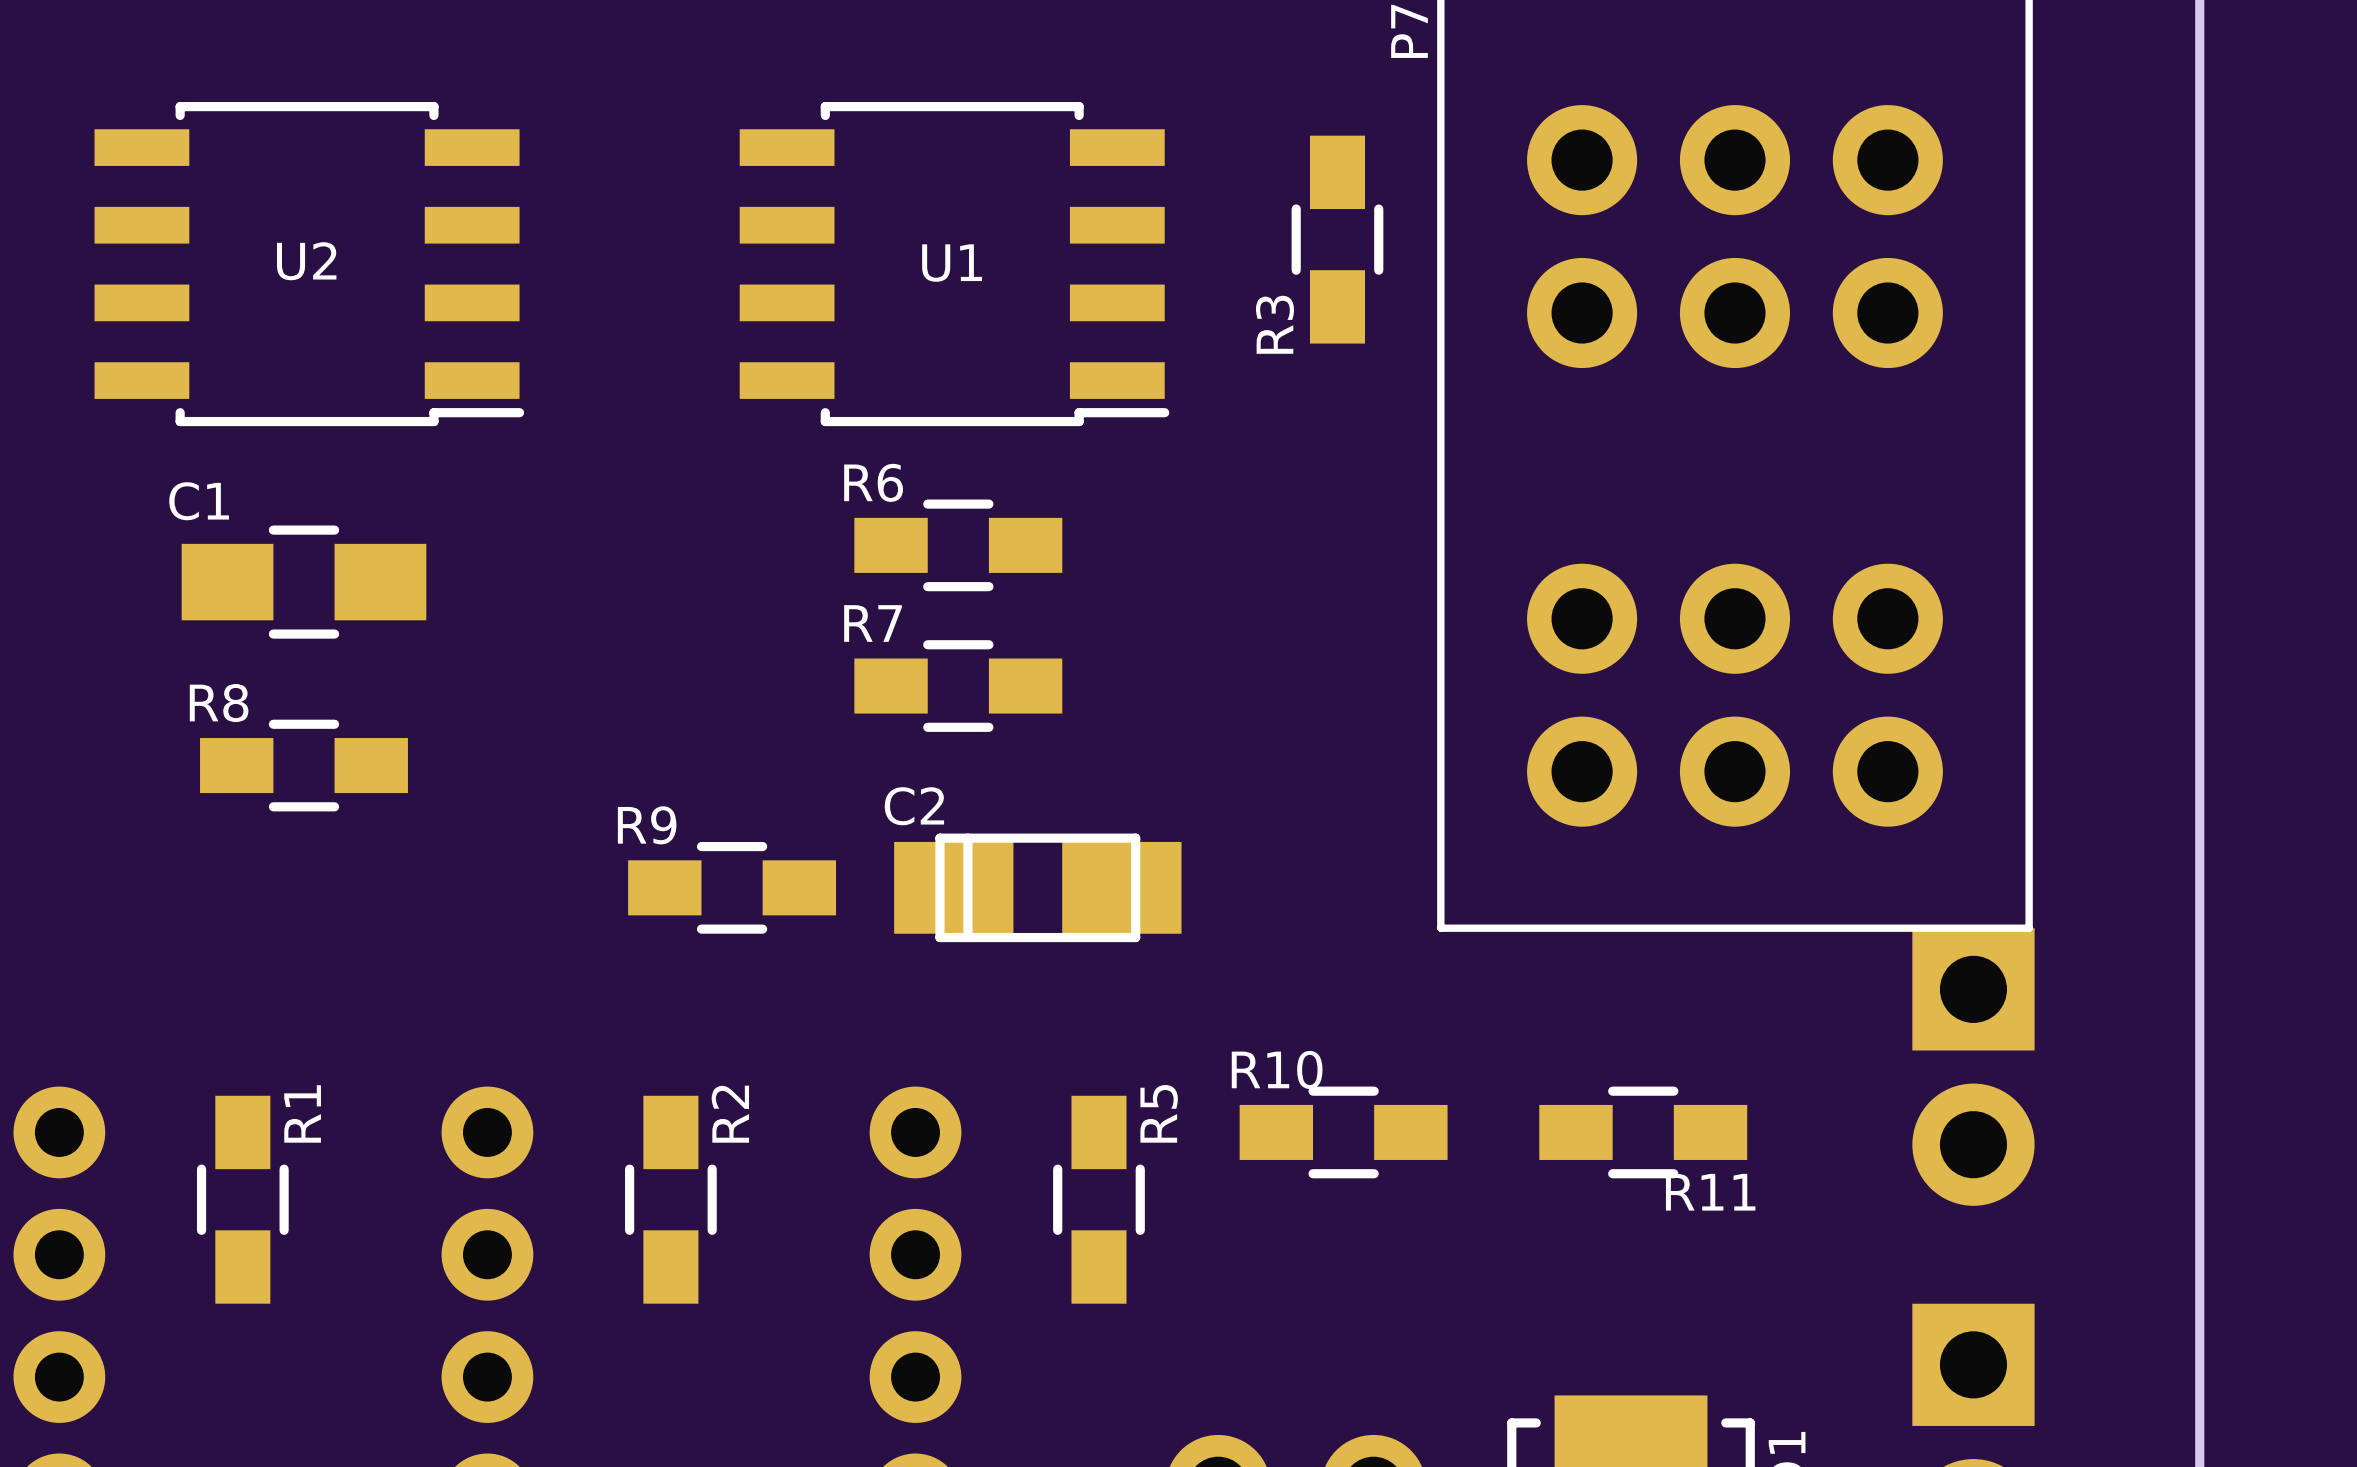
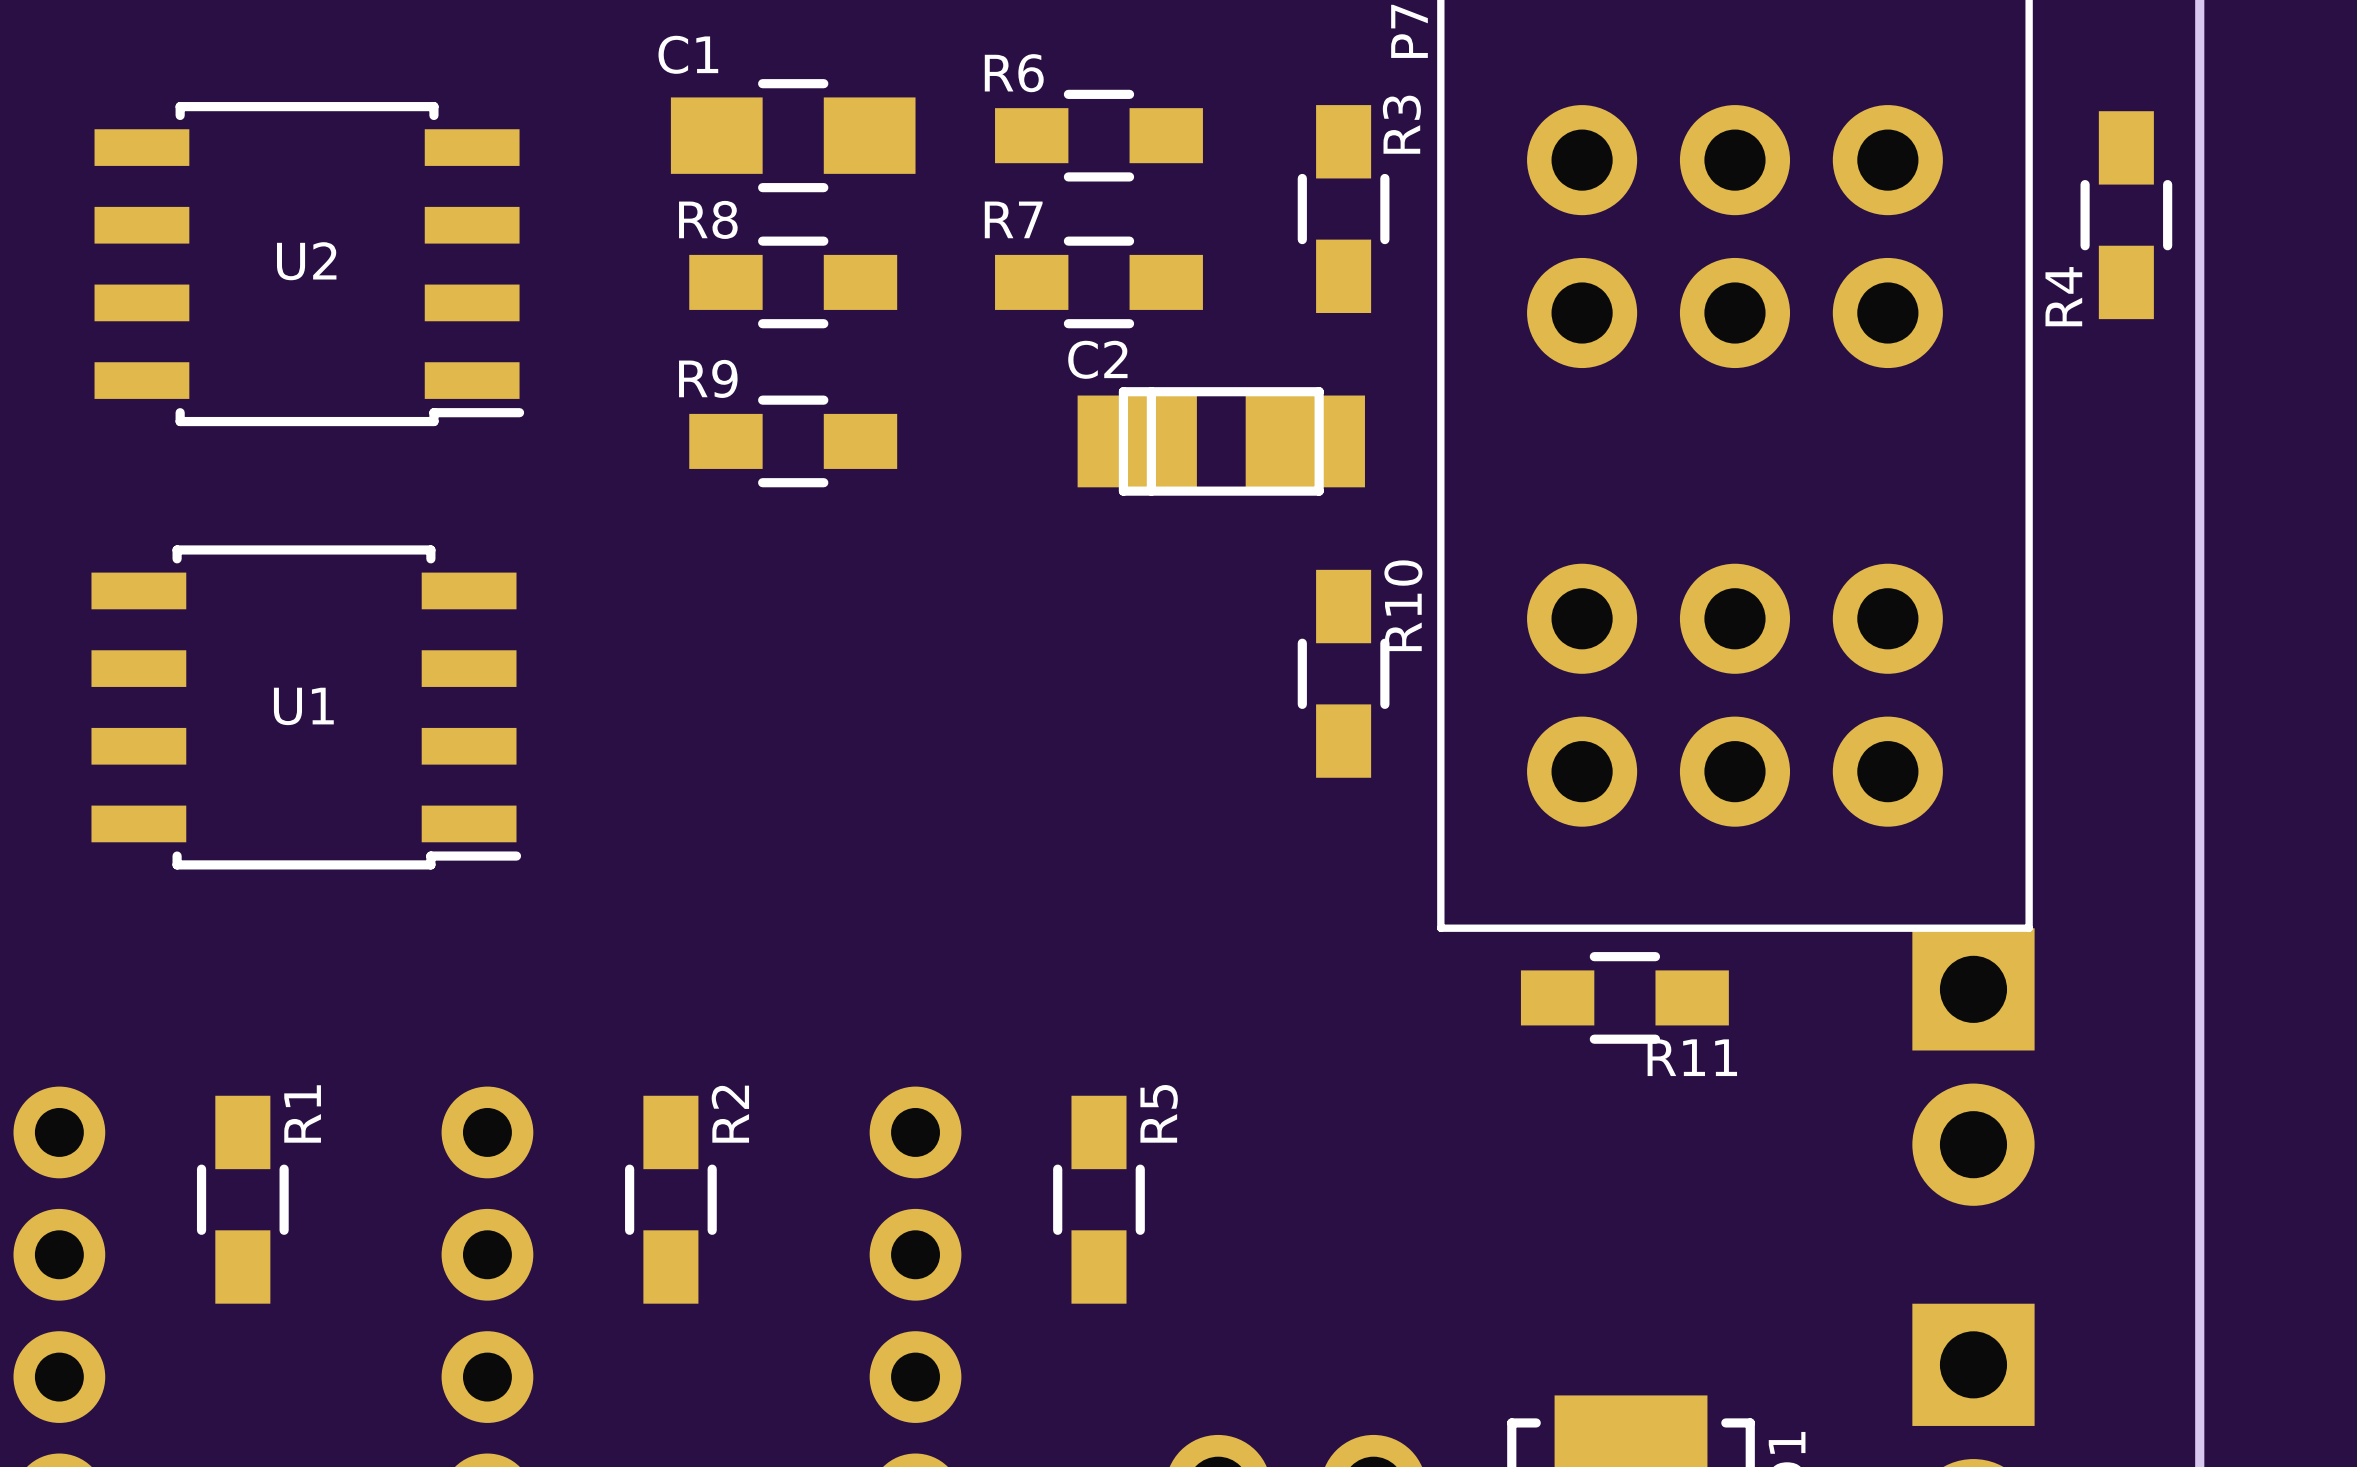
R4: none -> (2126, 215)
R3 position: (1337, 239) -> (1343, 209)
U1 position: (954, 264) -> (306, 707)
R3 name position: R3 (1274, 324) -> R3 (1401, 124)
R6 position: (958, 545) -> (1098, 135)
C1 position: (303, 582) -> (793, 135)
R7 position: (958, 686) -> (1098, 282)
R8 position: (303, 765) -> (793, 282)
R9 position: (732, 887) -> (793, 441)
C2 position: (1037, 887) -> (1221, 441)
R10 rotation: 0° (1343, 1132) -> 90° clockwise (1343, 673)
R10 position: (1343, 1132) -> (1343, 673)
R11 position: (1643, 1132) -> (1624, 997)

